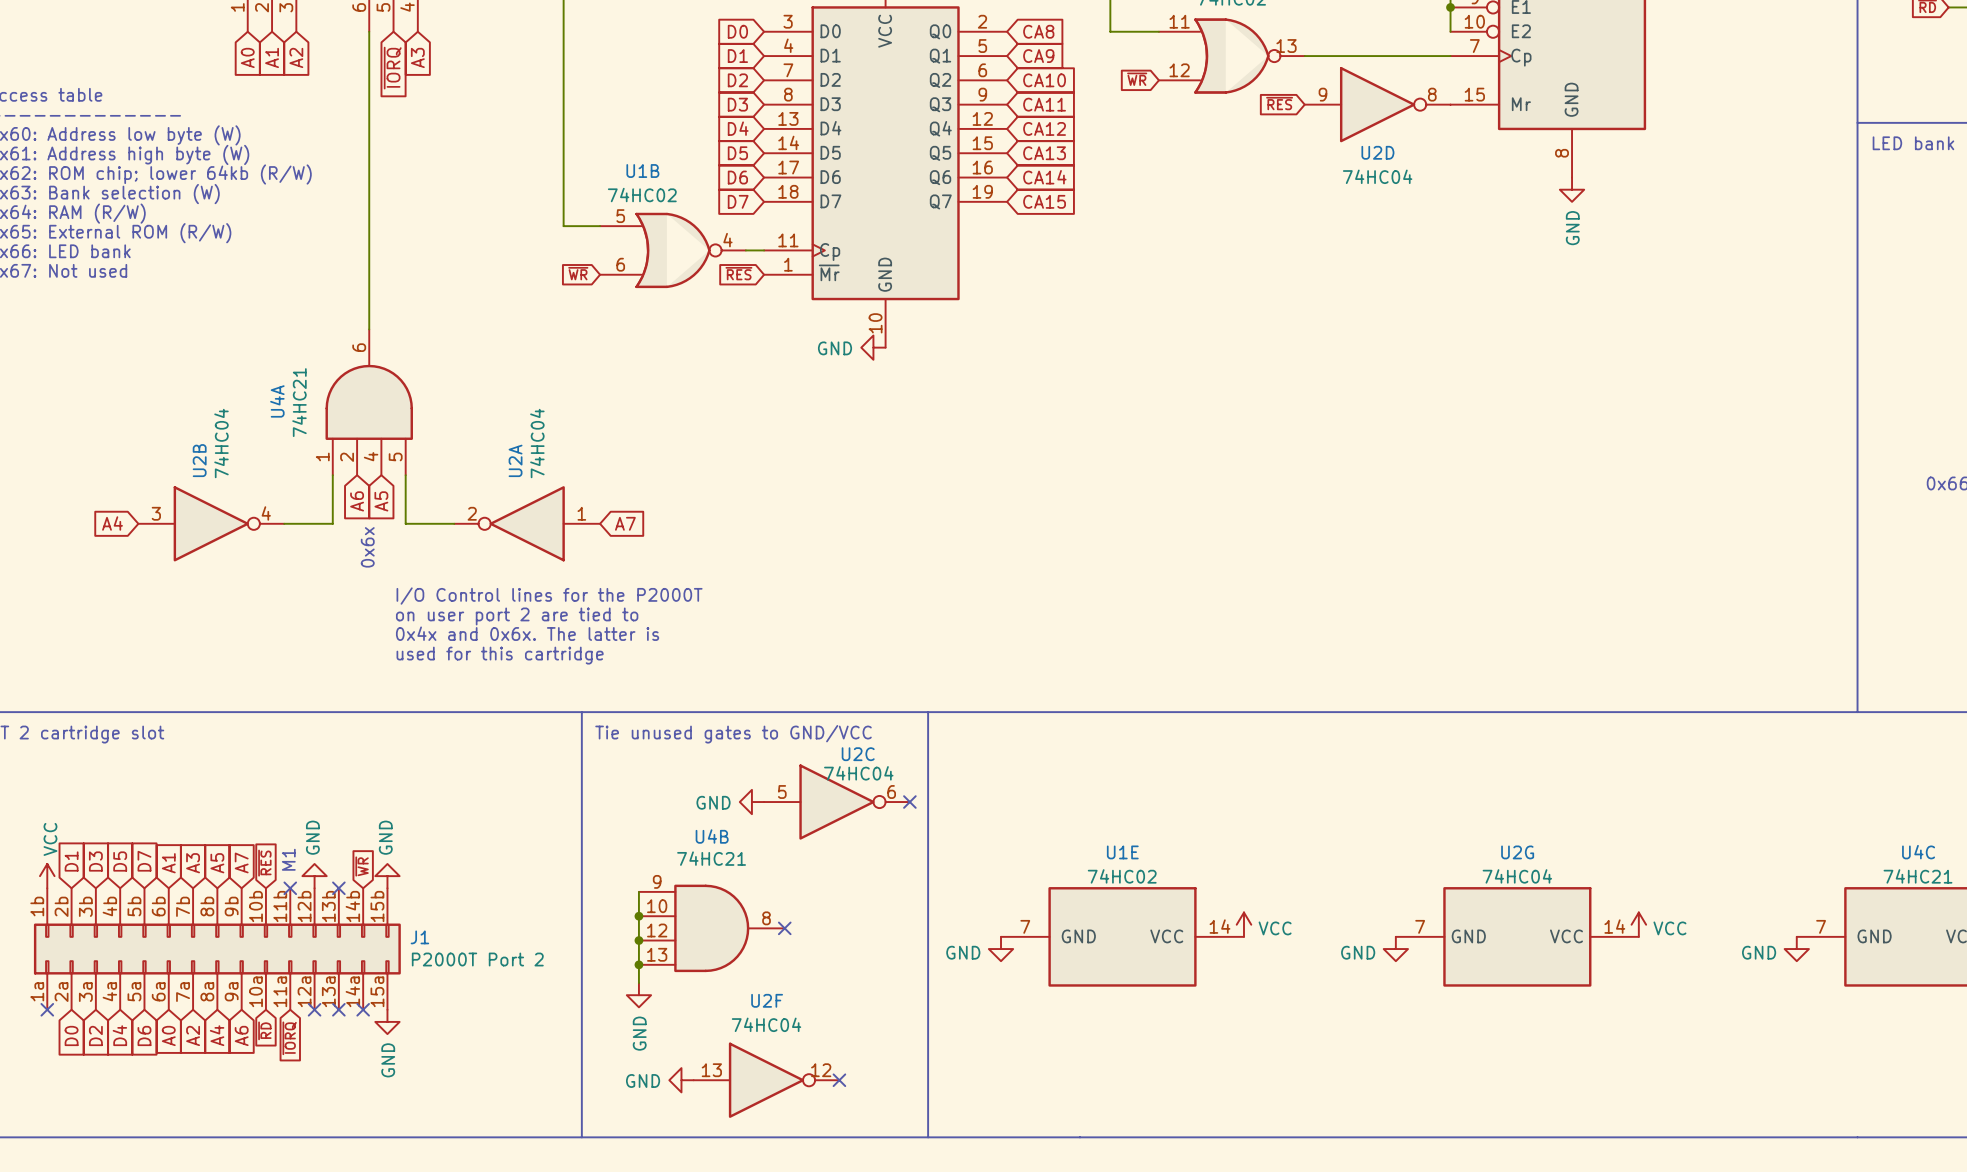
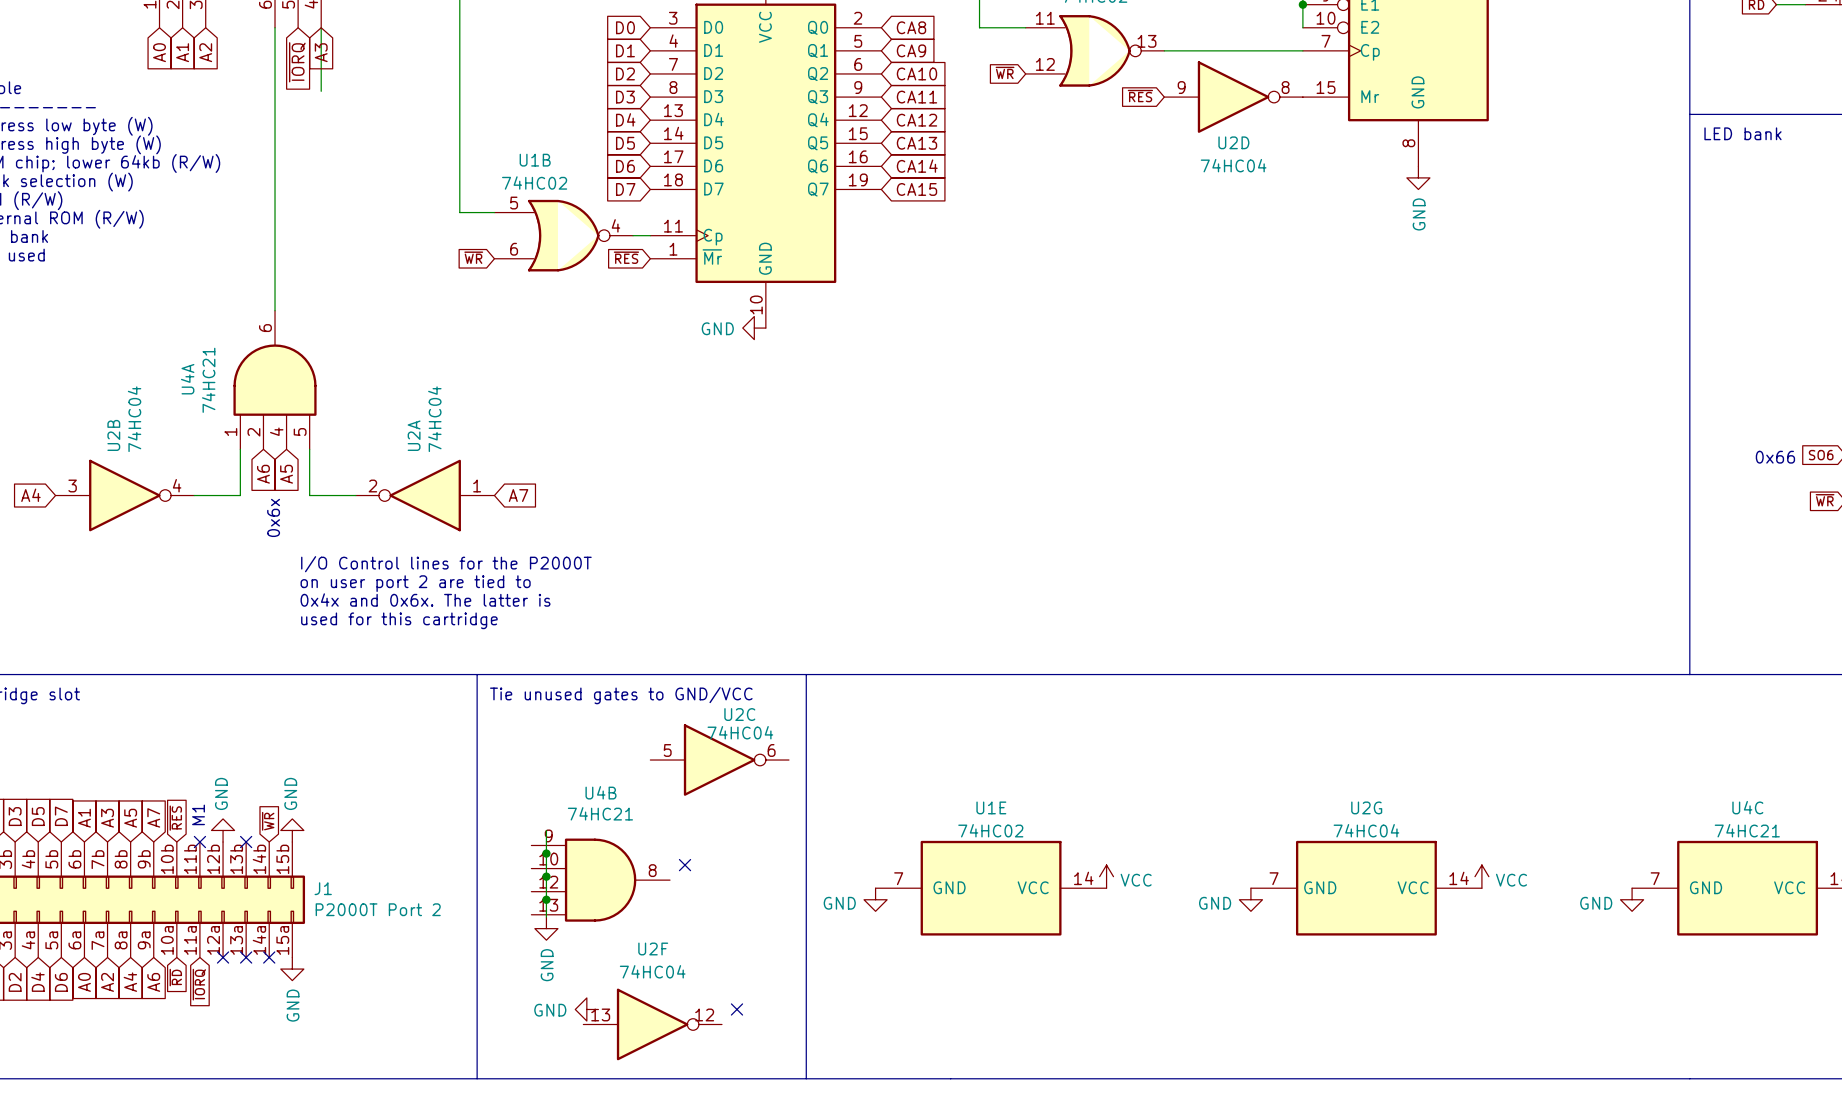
wire: none -> (321, 27) (321, 91)
power symbol: GND (751, 802) -> none
no-connect mark: (909, 802) -> none
wire: (638, 891) (638, 983) -> (546, 830) (546, 917)
junction: none -> (546, 853)
junction: (638, 916) -> none
junction: none -> (546, 876)
no-connect mark position: (784, 928) -> (685, 865)
junction: (638, 940) -> none
junction: none -> (546, 899)
junction: (638, 964) -> none
power symbol position: GND (638, 995) -> GND (546, 928)
power symbol position: GND (681, 1080) -> GND (586, 1009)
no-connect mark position: (839, 1080) -> (736, 1009)

